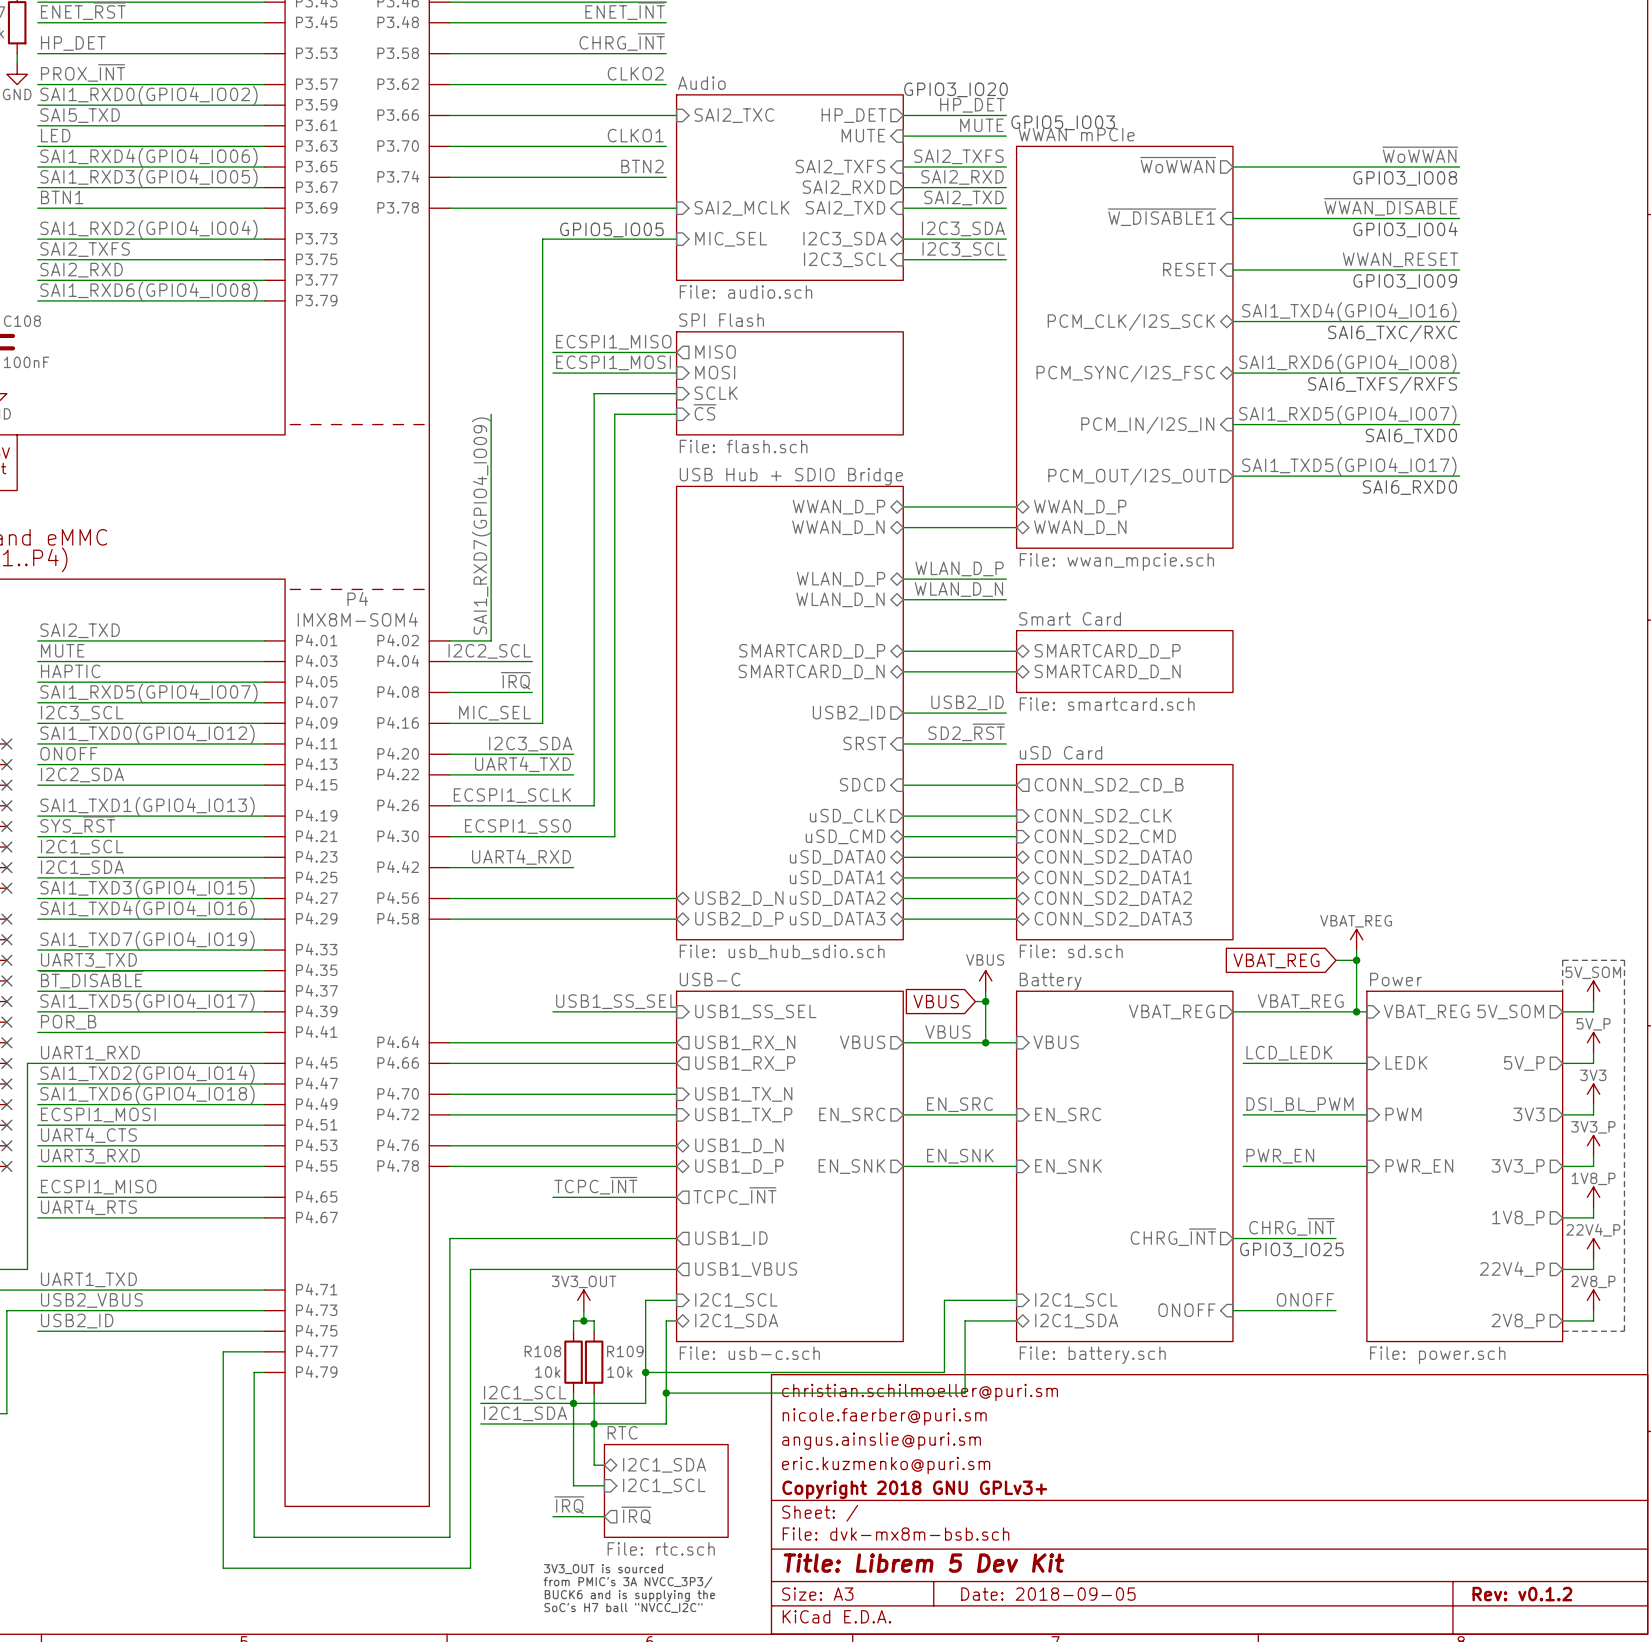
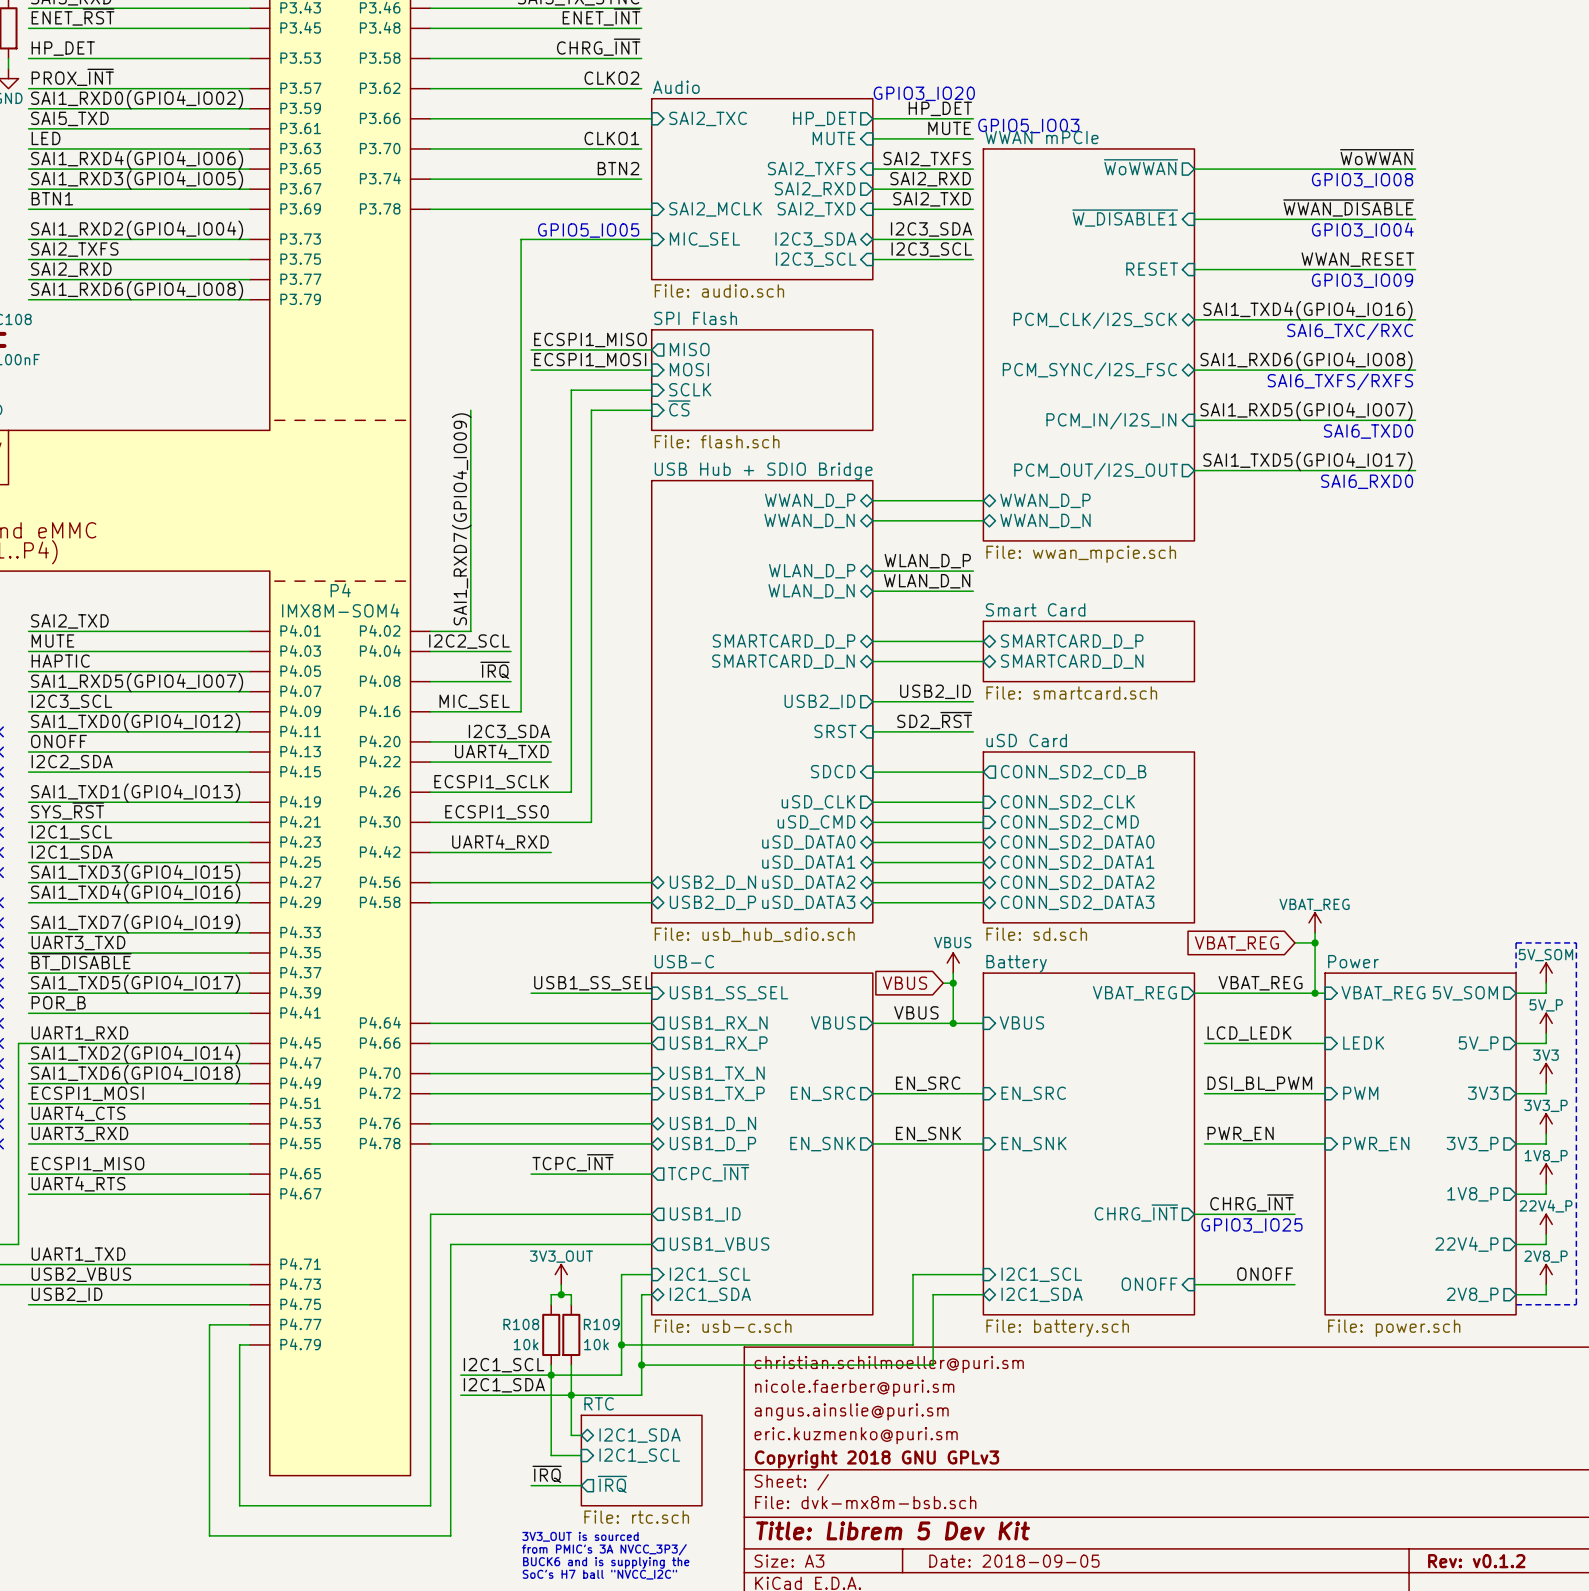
title block: Copyright 2018 GNU GPLv3+ (914, 1489) -> Copyright 2018 GNU GPLv3 (877, 1459)

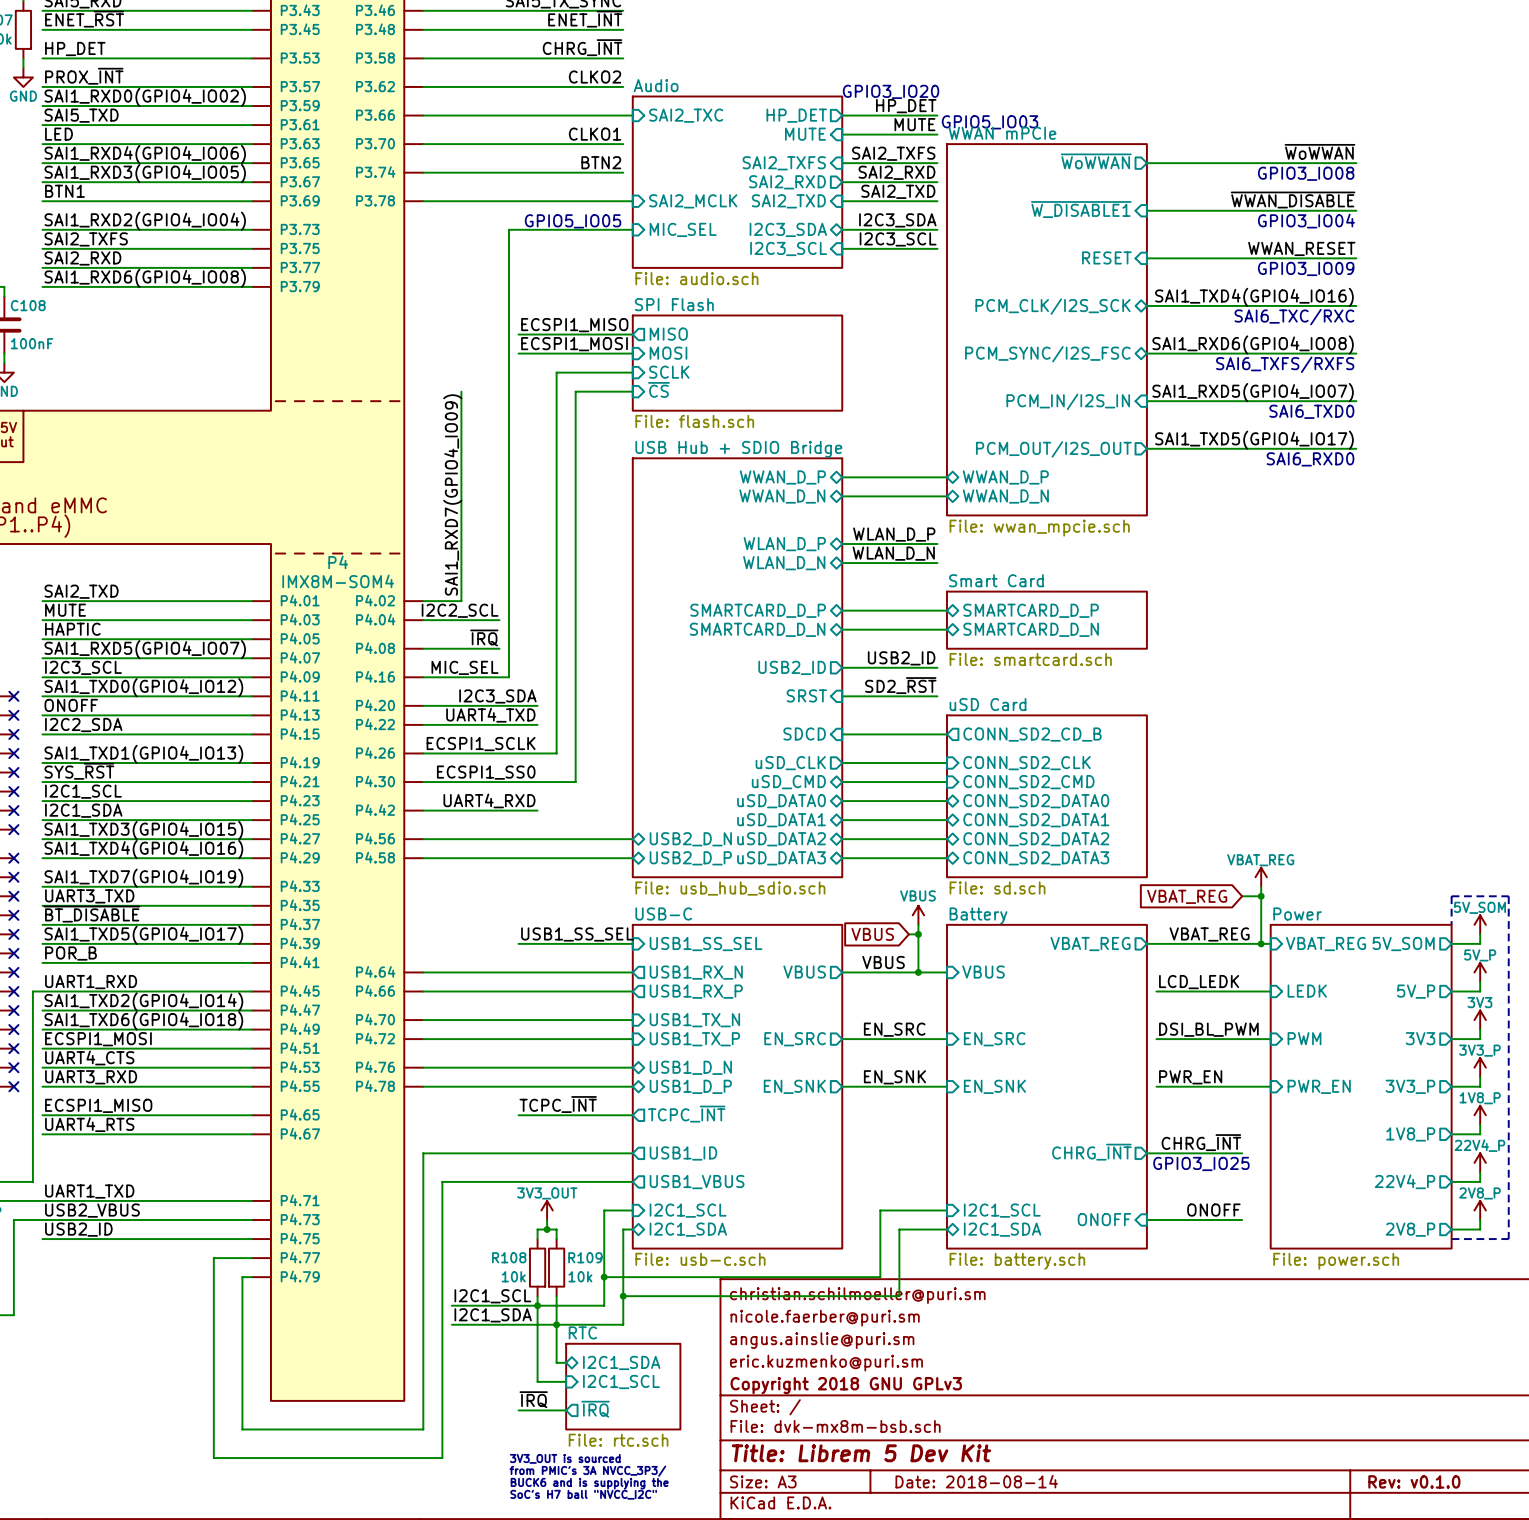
title block: Date: 2018-09-05 (1014, 1561) -> Date: 2018-08-14 (976, 1481)
title block: Rev: v0.1.2 (1476, 1561) -> Rev: v0.1.0 (1414, 1481)

